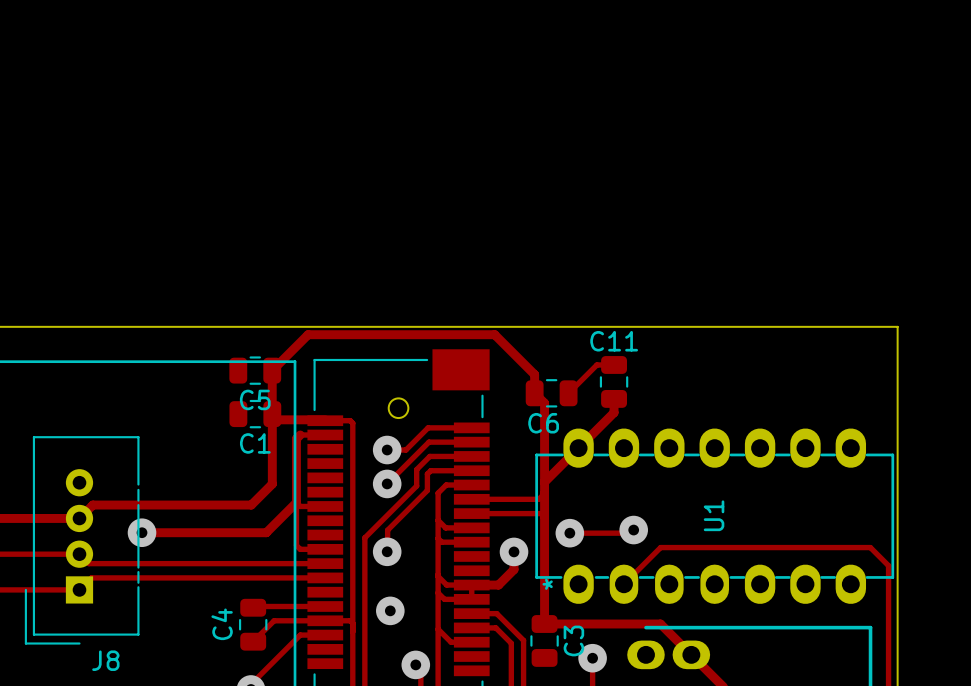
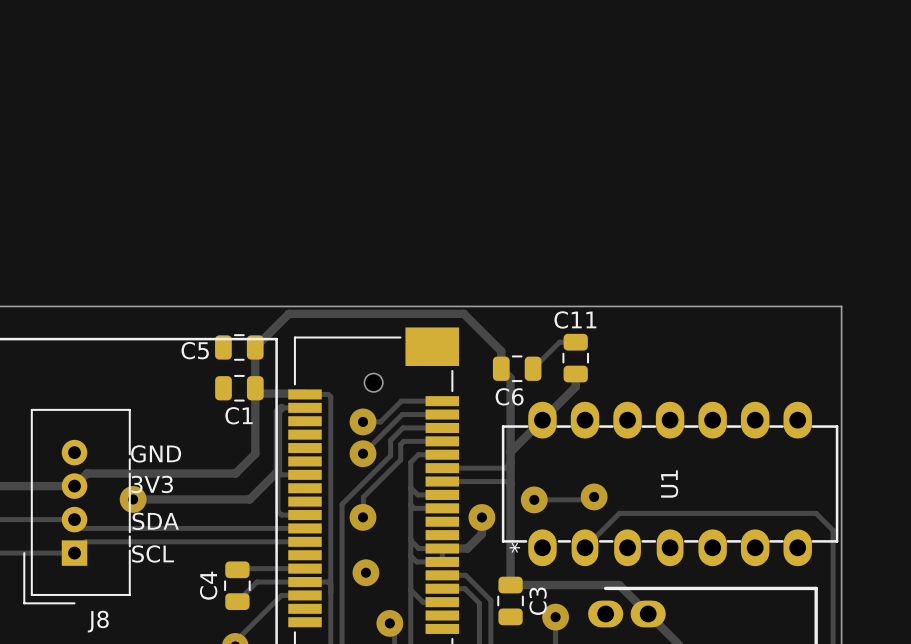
C5 name position: C5 (255, 399) -> C5 (195, 350)
text: none -> GND (156, 453)
text: none -> 3V3 (152, 484)
text: none -> SDA (155, 521)
text: none -> SCL (153, 553)

